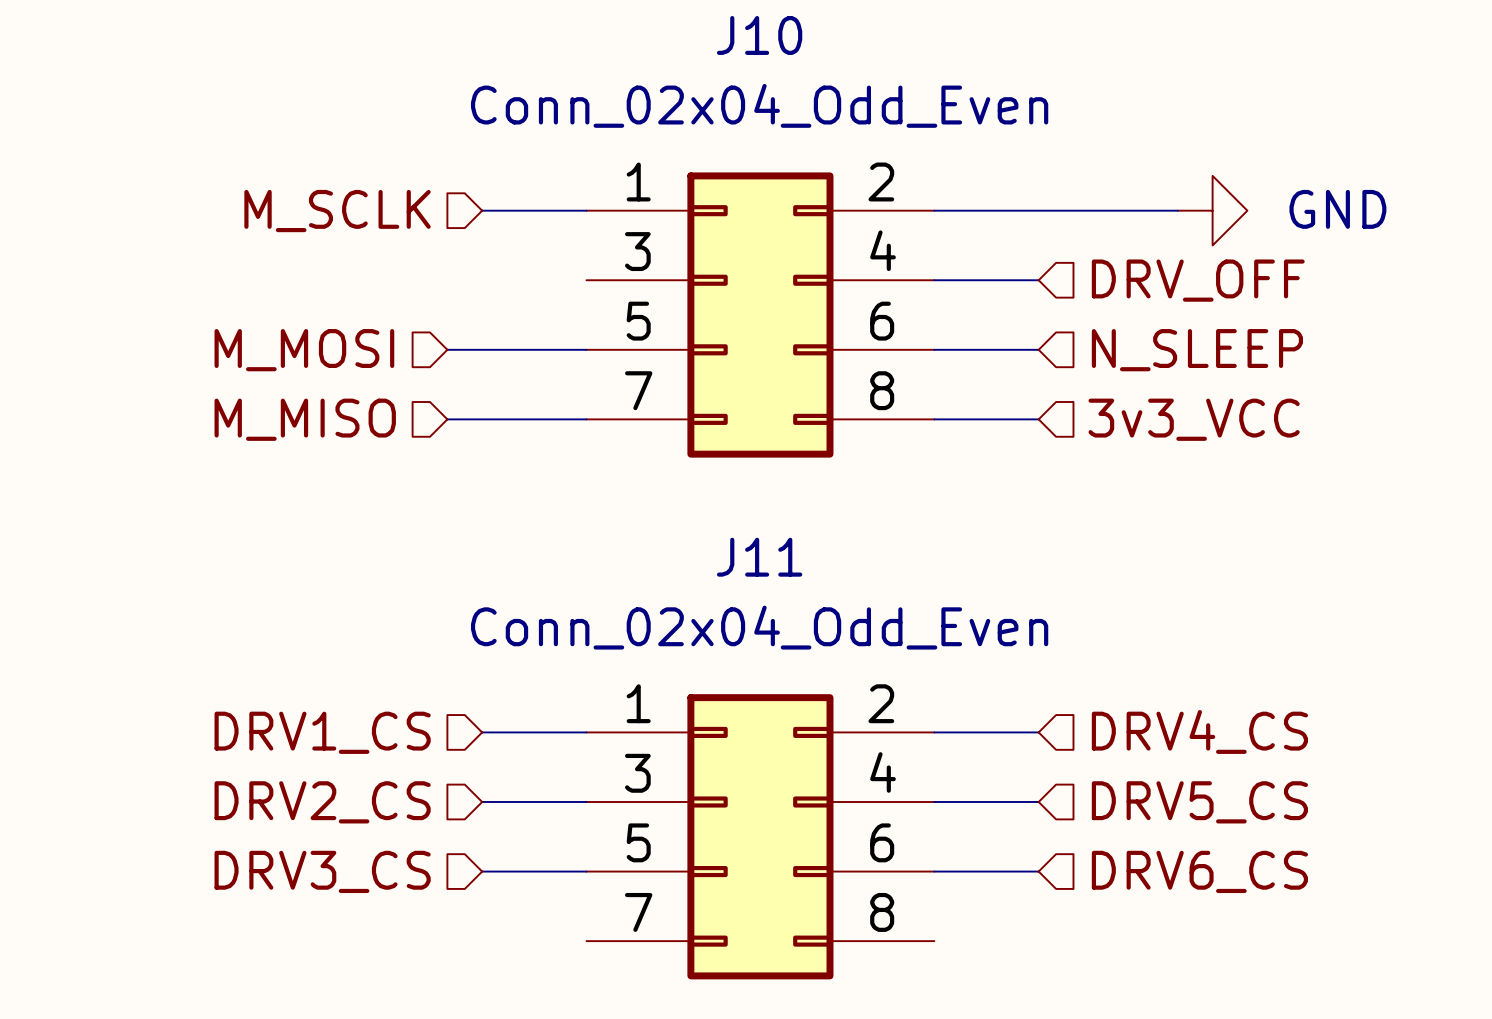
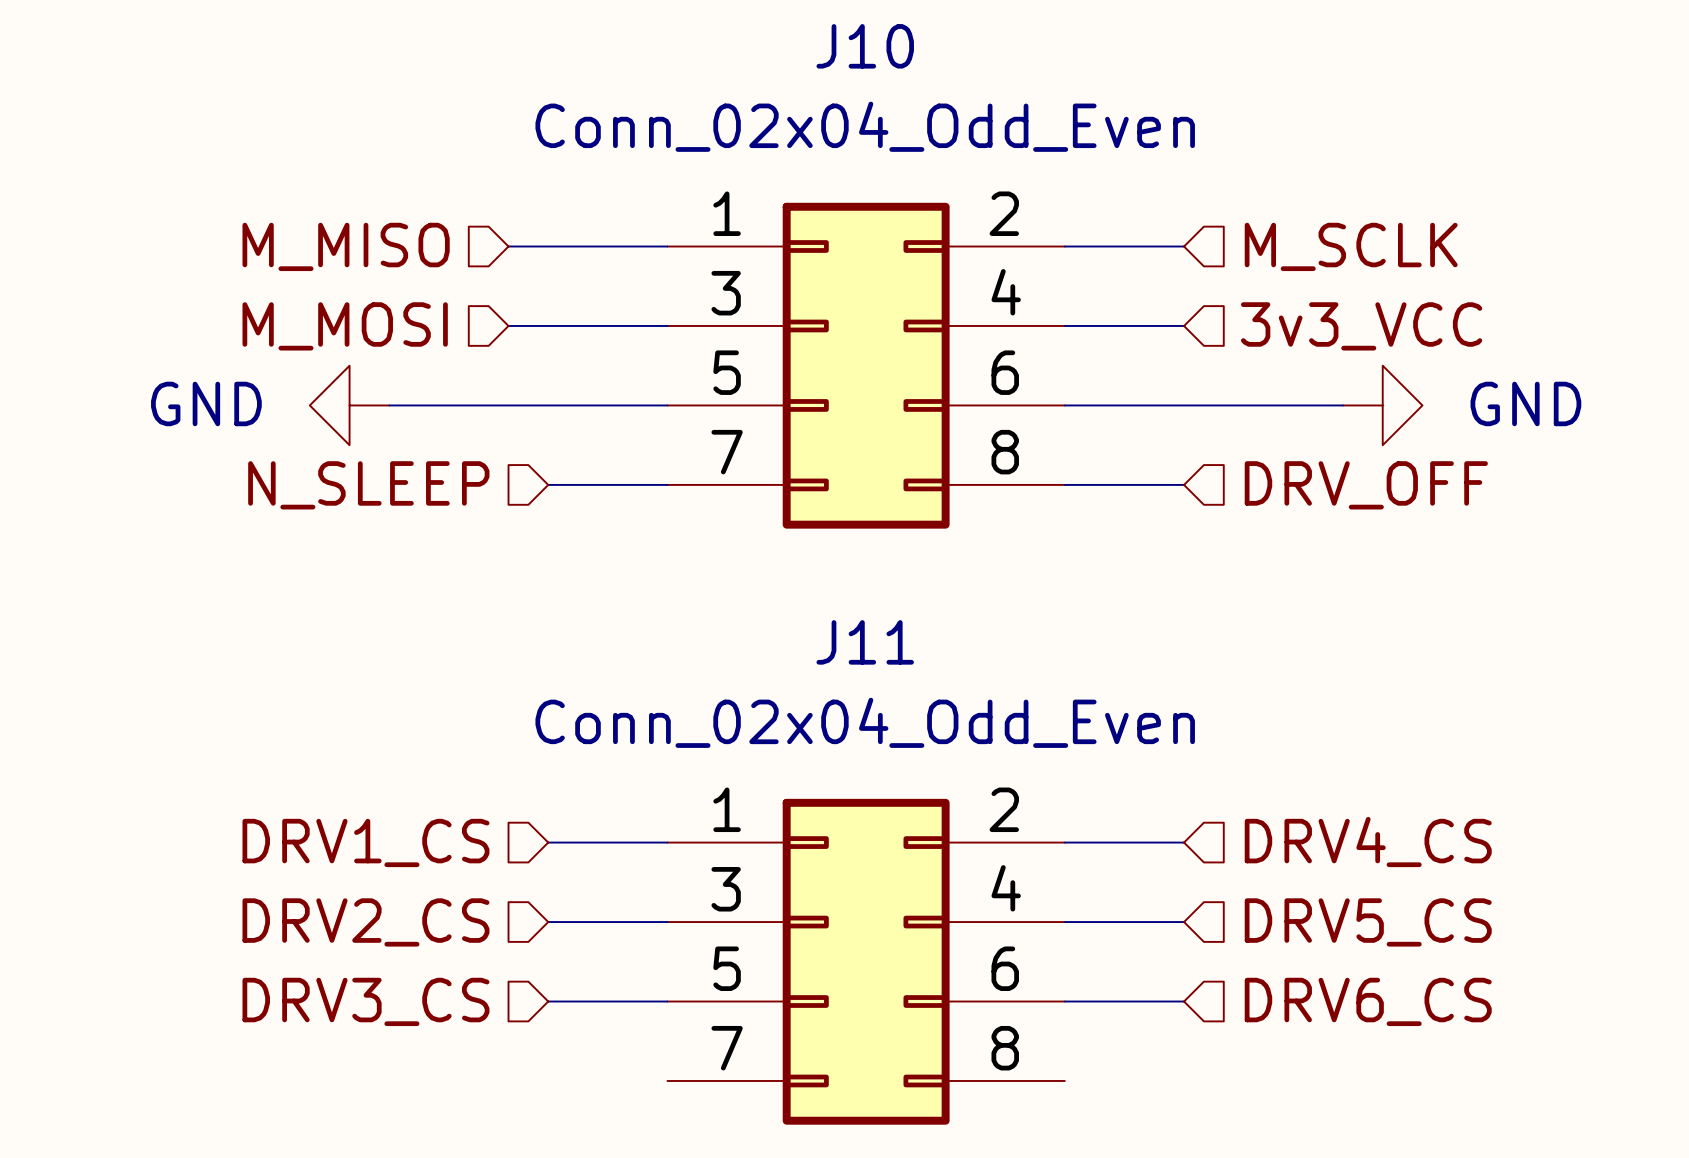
wire: (1038, 210) (1177, 210) -> (1184, 405) (1342, 405)
power symbol position: GND (1212, 210) -> GND (1382, 405)
hierarchical label rotation: 0° (337, 211) -> 180° (1351, 246)
hierarchical label position: M_SCLK (337, 211) -> M_SCLK (1351, 246)
wire: none -> (508, 325) (667, 325)
hierarchical label: DRV_OFF (1198, 280) -> 3v3_VCC (1361, 326)
power symbol: none -> GND (349, 405)
wire: none -> (389, 405) (508, 405)
hierarchical label position: M_MOSI (304, 350) -> M_MOSI (345, 326)
hierarchical label rotation: 0° (1197, 350) -> 180° (368, 485)
hierarchical label position: N_SLEEP (1197, 350) -> N_SLEEP (368, 485)
hierarchical label position: M_MISO (305, 419) -> M_MISO (346, 246)
wire: (447, 419) (482, 419) -> (508, 246) (548, 246)
hierarchical label: 3v3_VCC (1194, 419) -> DRV_OFF (1366, 485)

